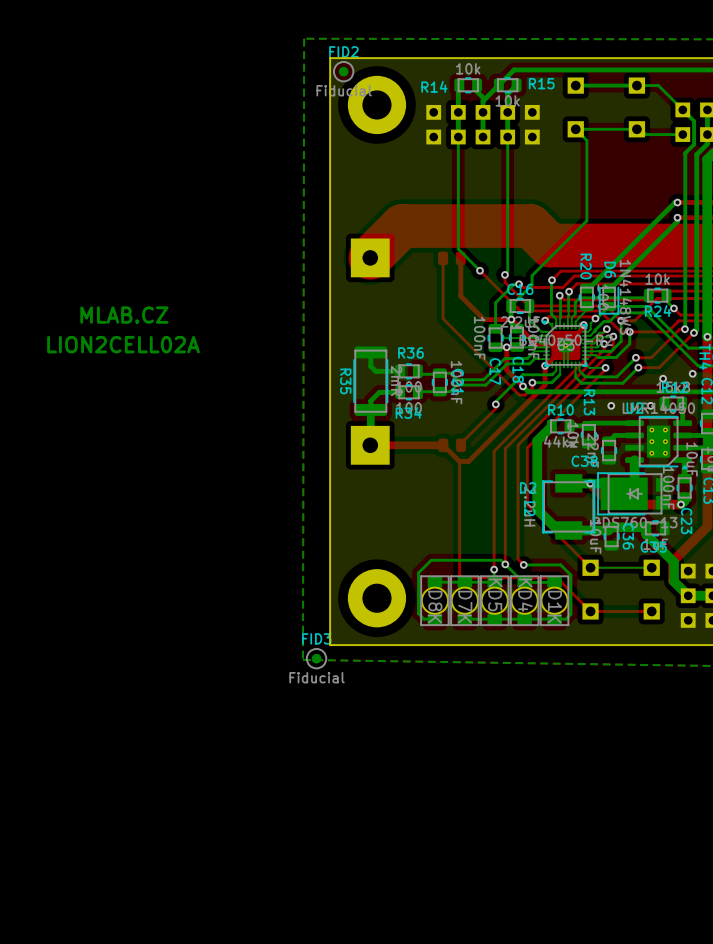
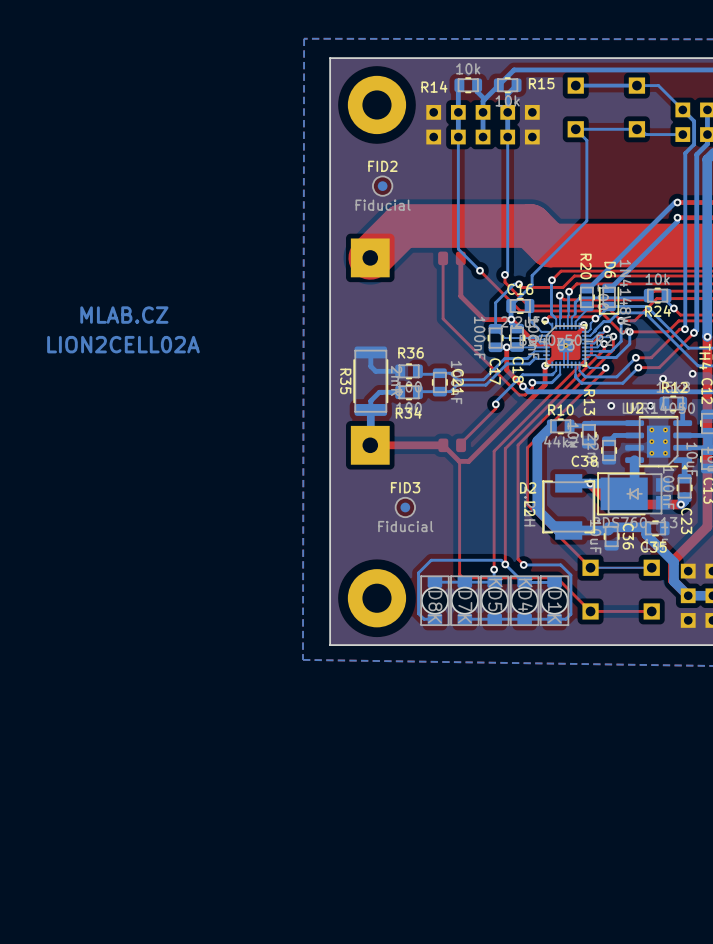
FID2 position: (343, 71) -> (382, 186)
FID3 position: (316, 658) -> (405, 507)

